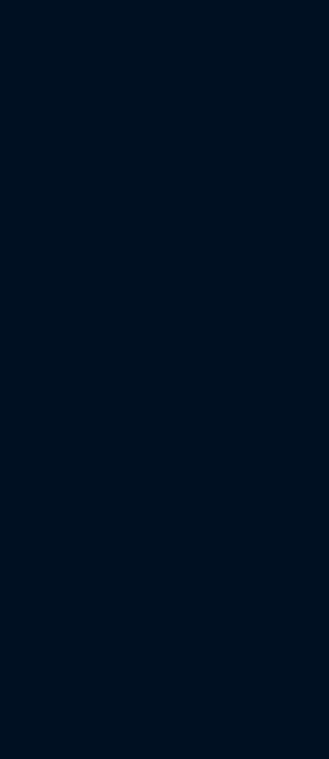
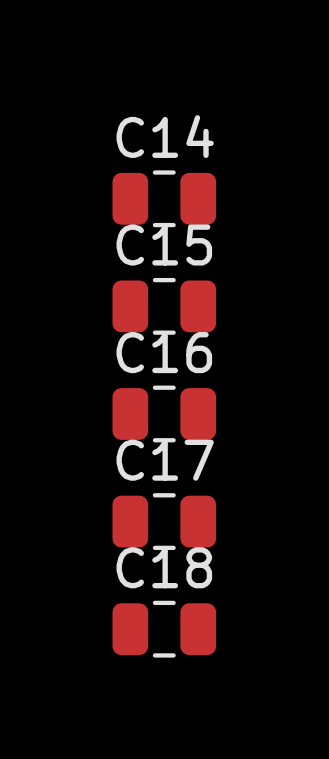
C14: none -> (164, 198)
C15: none -> (164, 306)
C16: none -> (164, 413)
C17: none -> (164, 521)
C18: none -> (164, 629)

